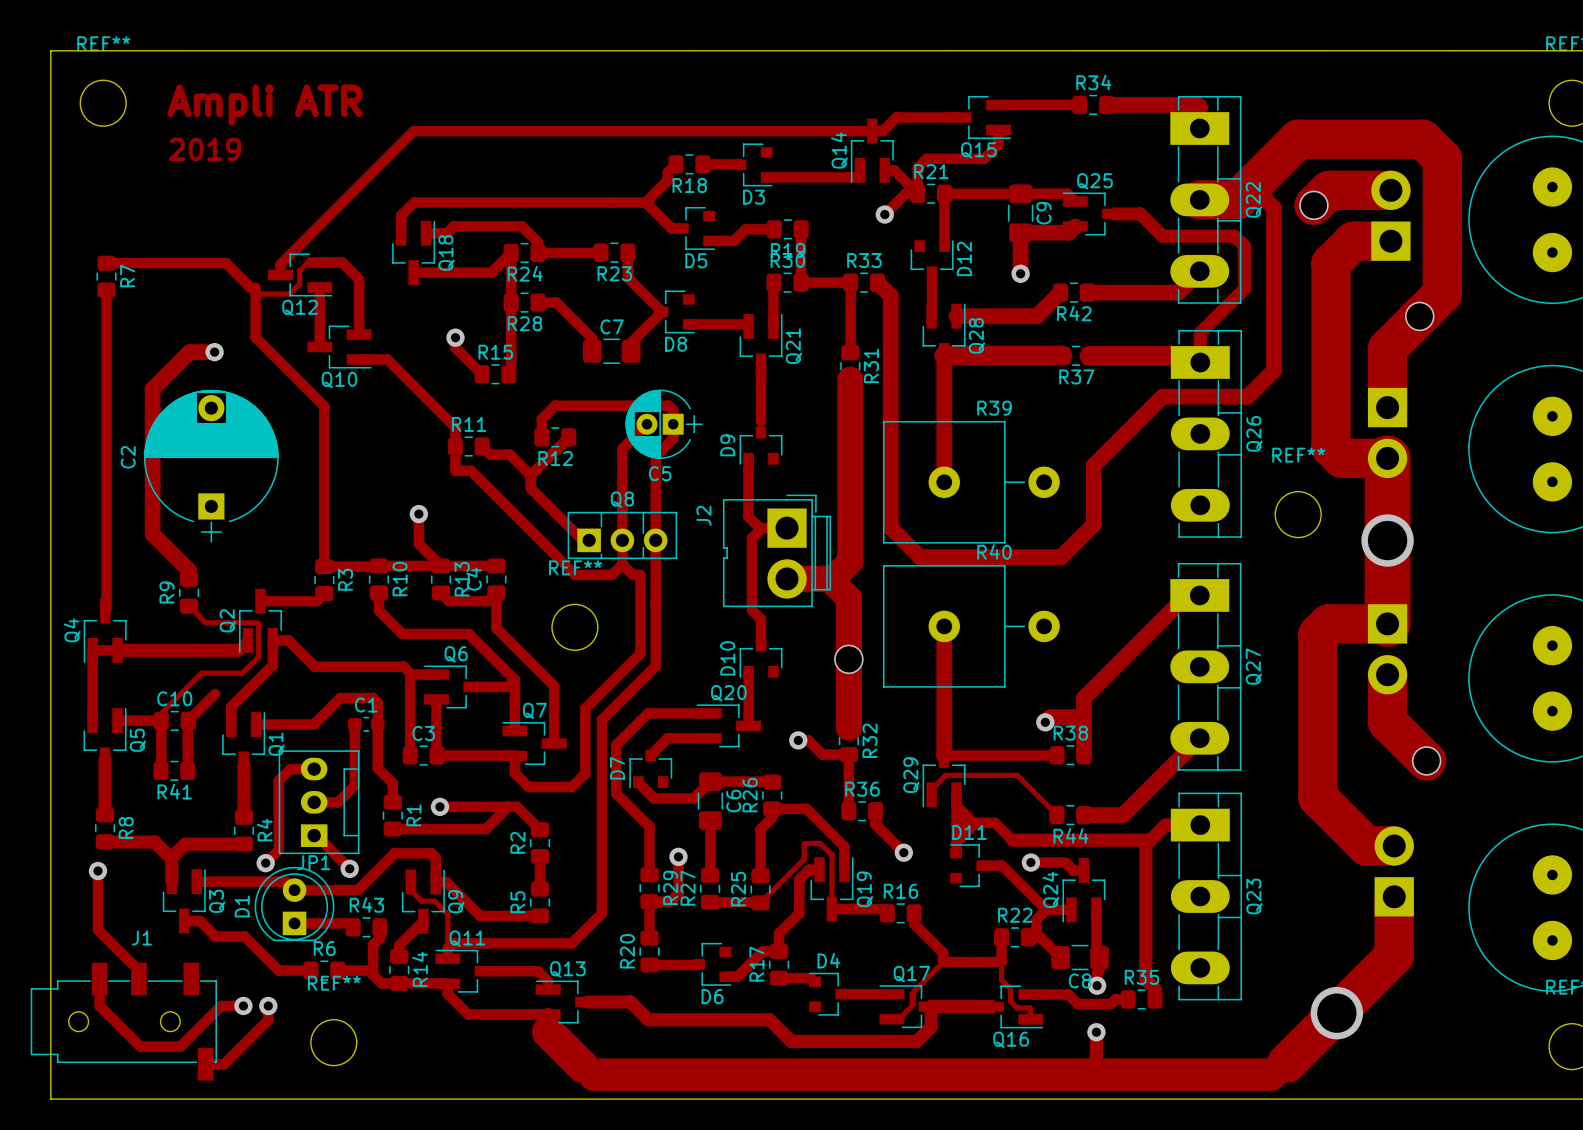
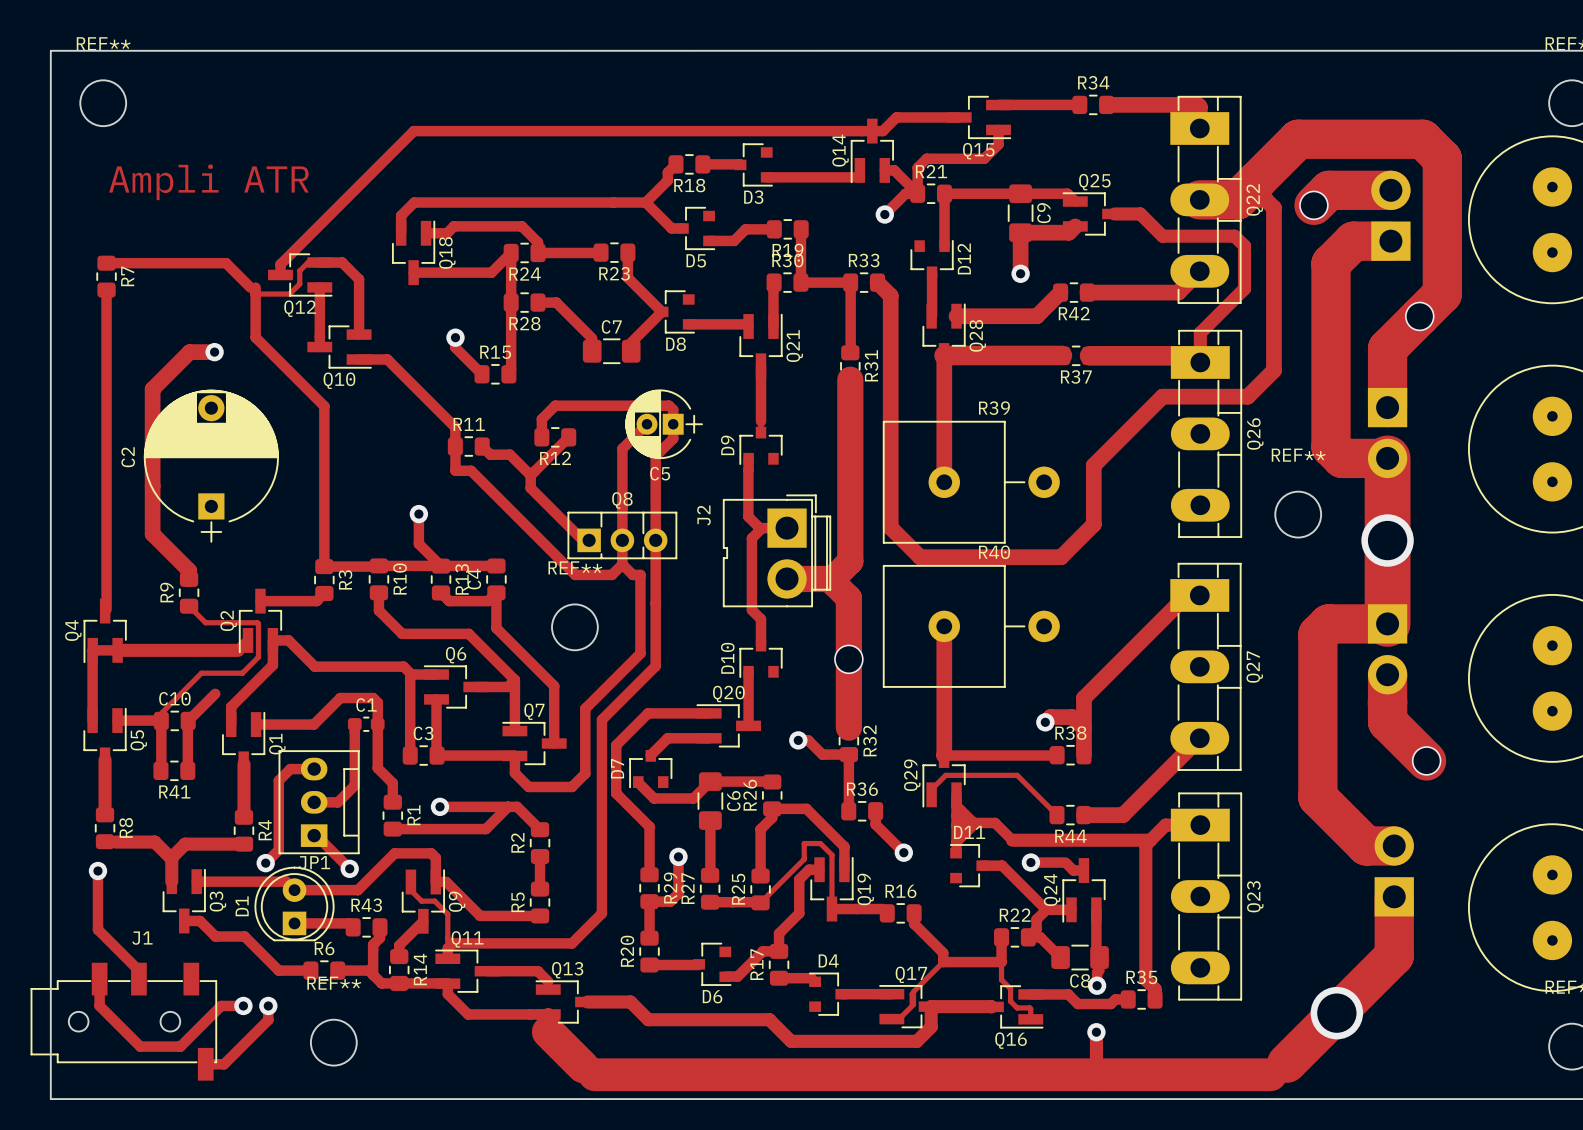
text position: Ampli ATR (265, 105) -> Ampli ATR (208, 182)
text: 2019 (205, 149) -> none

